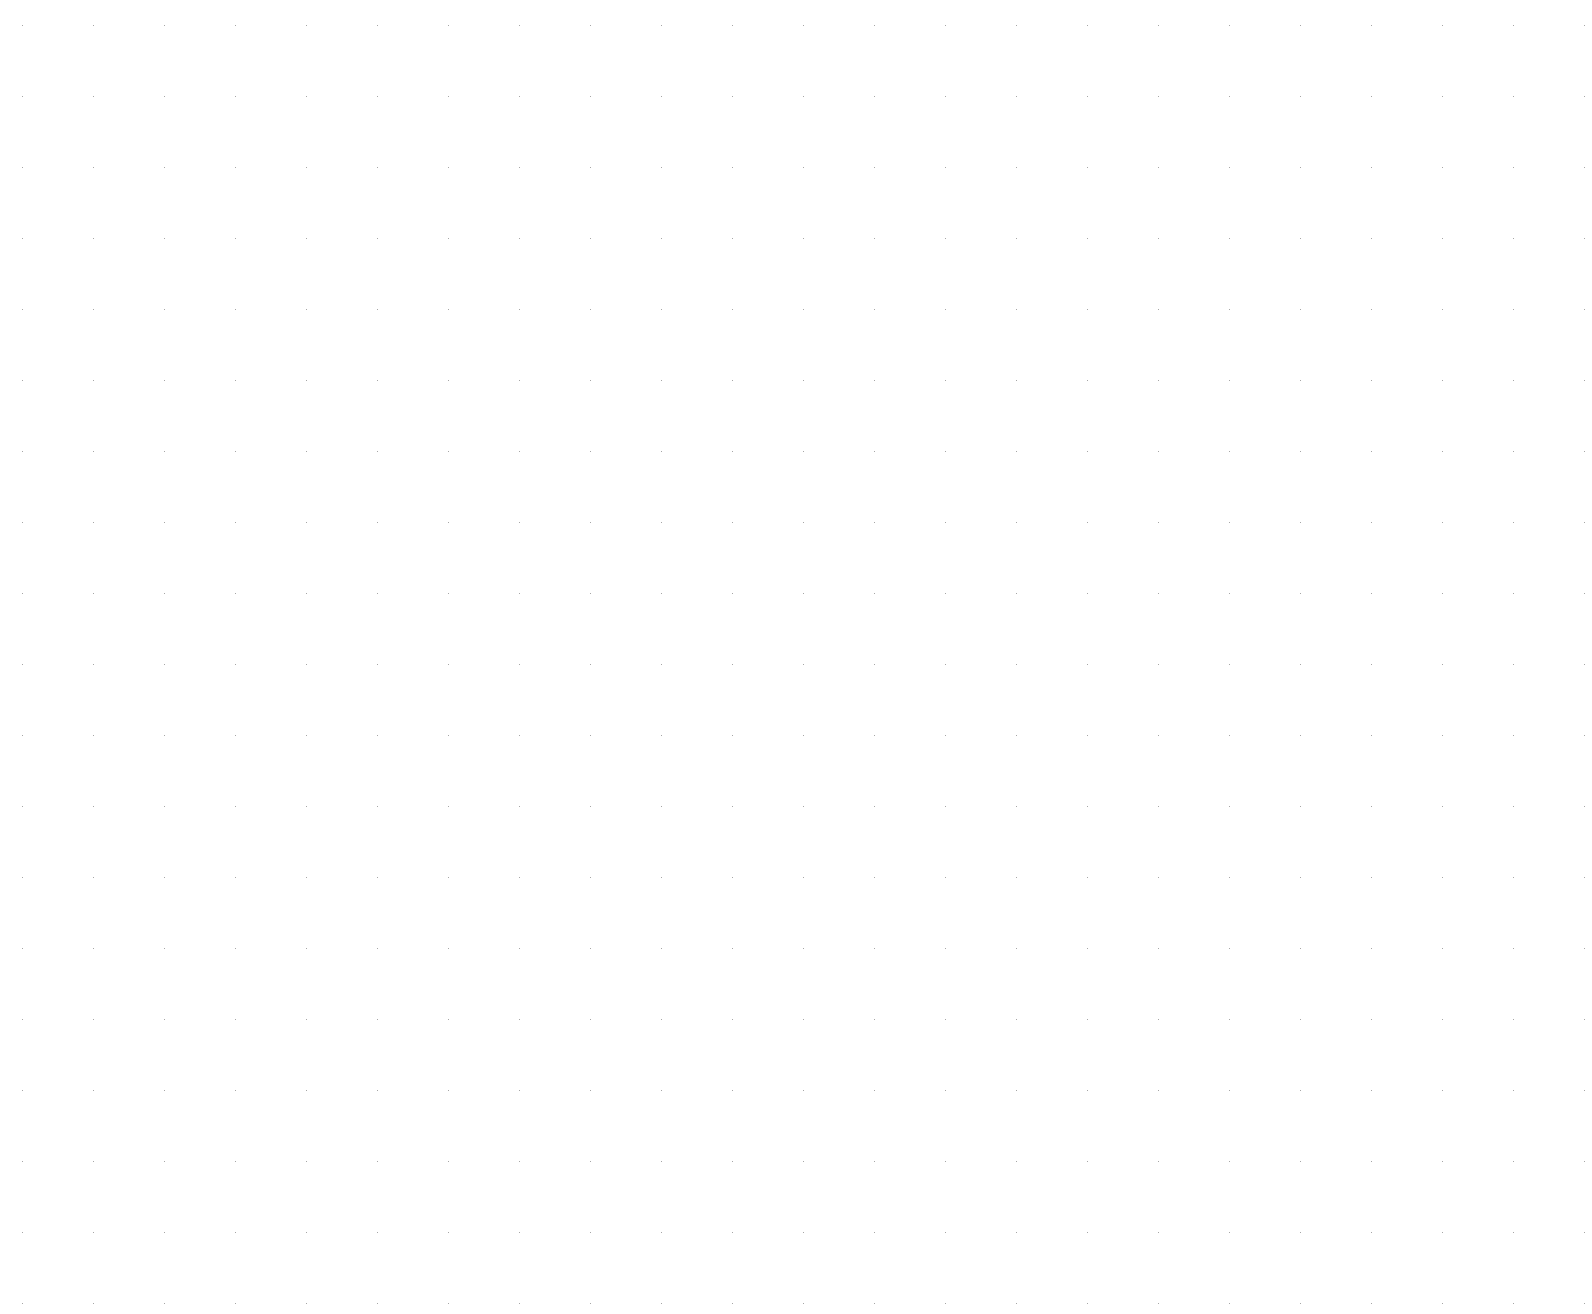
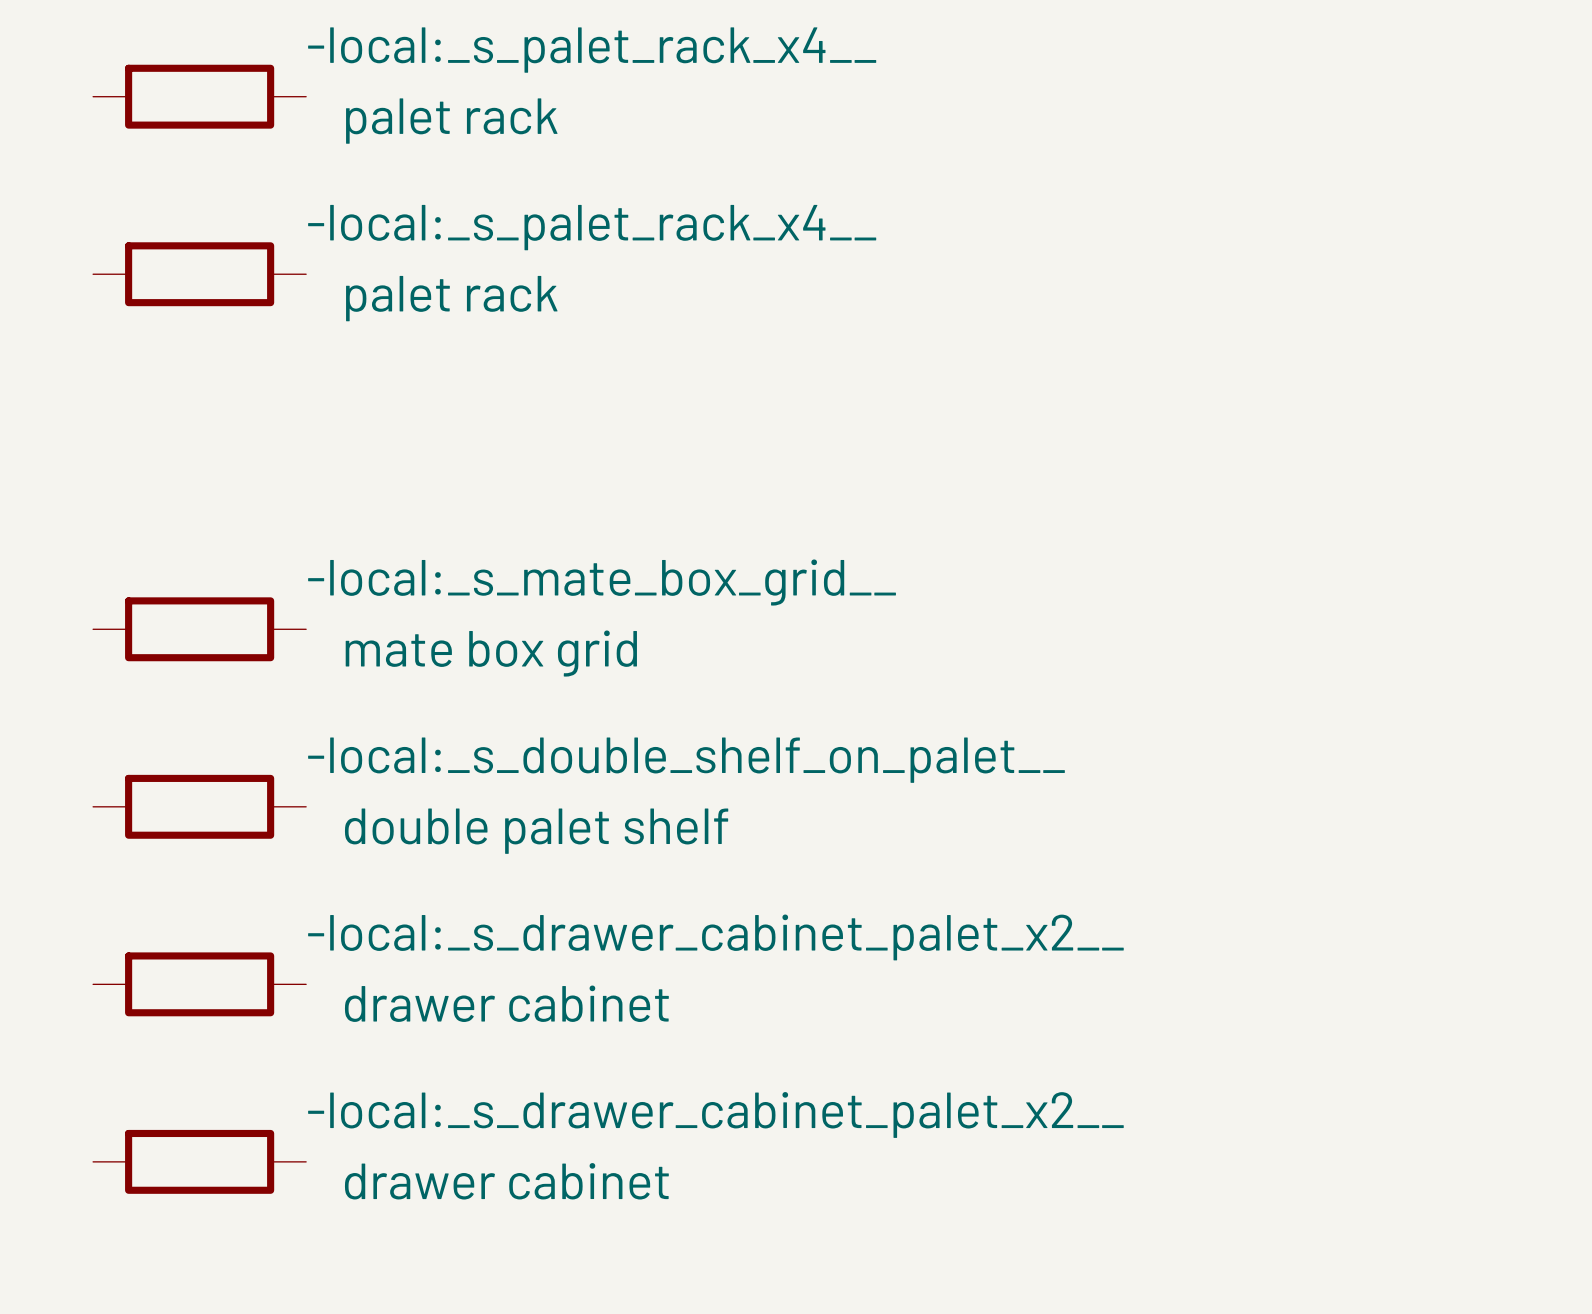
part: none -> palet rack (199, 96)
part: none -> palet rack (199, 274)
part: none -> mate box grid (199, 629)
part: none -> double palet shelf (199, 806)
part: none -> drawer cabinet (199, 984)
part: none -> drawer cabinet (199, 1161)

